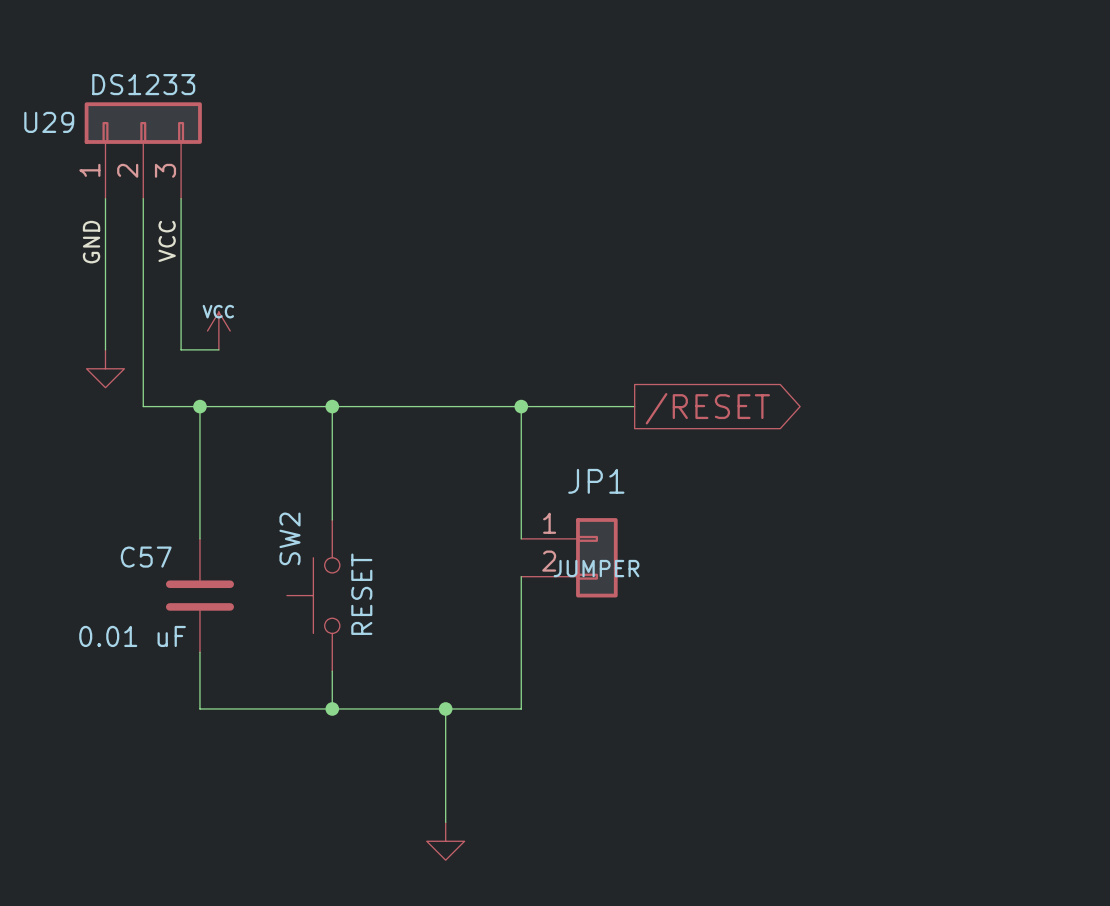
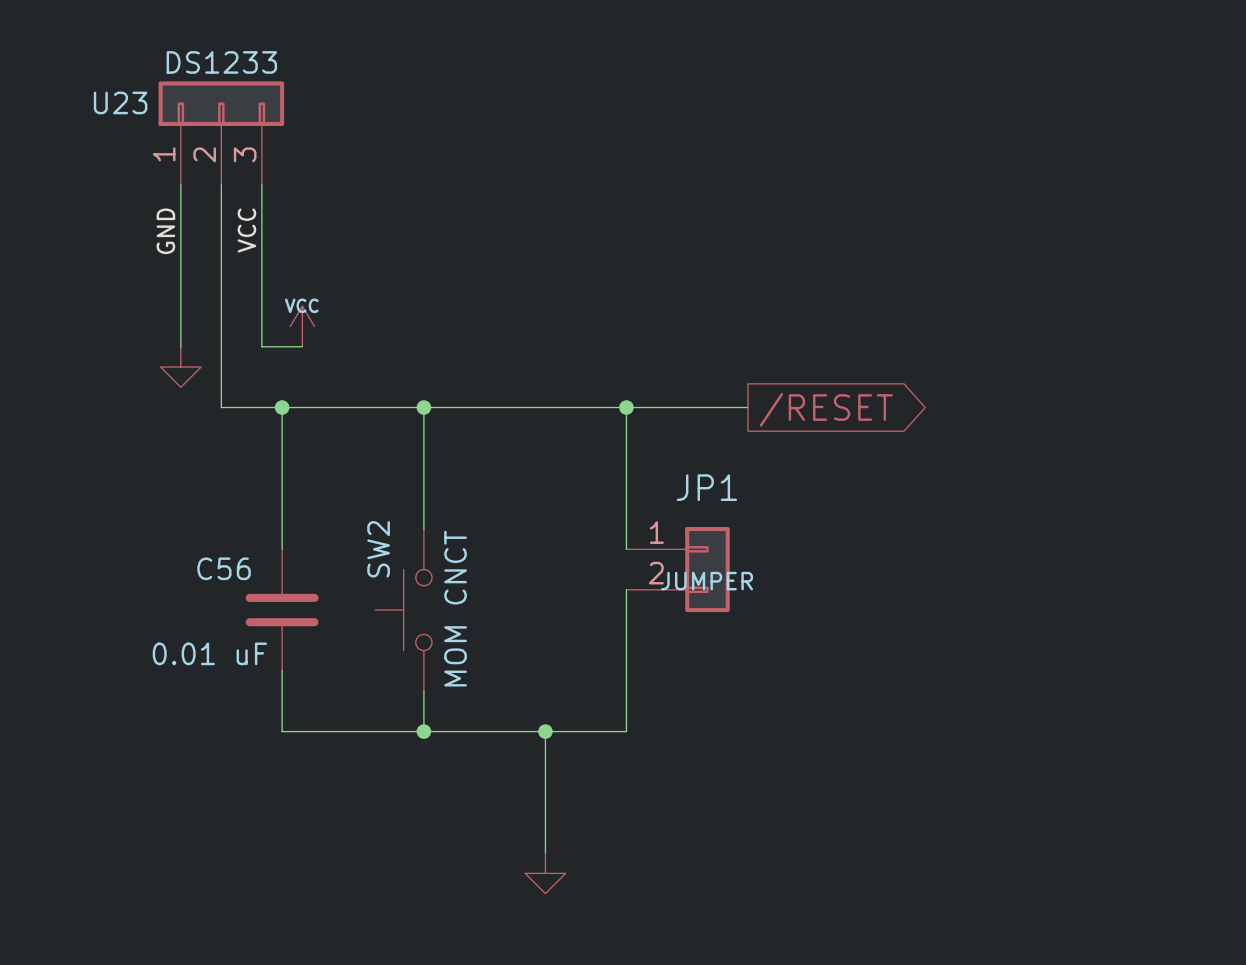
U29 name: U29 (49, 122) -> U23 (120, 102)
C57 name: C57 (146, 557) -> C56 (224, 568)
SW2 value: RESET (361, 594) -> MOM CNCT (455, 608)

